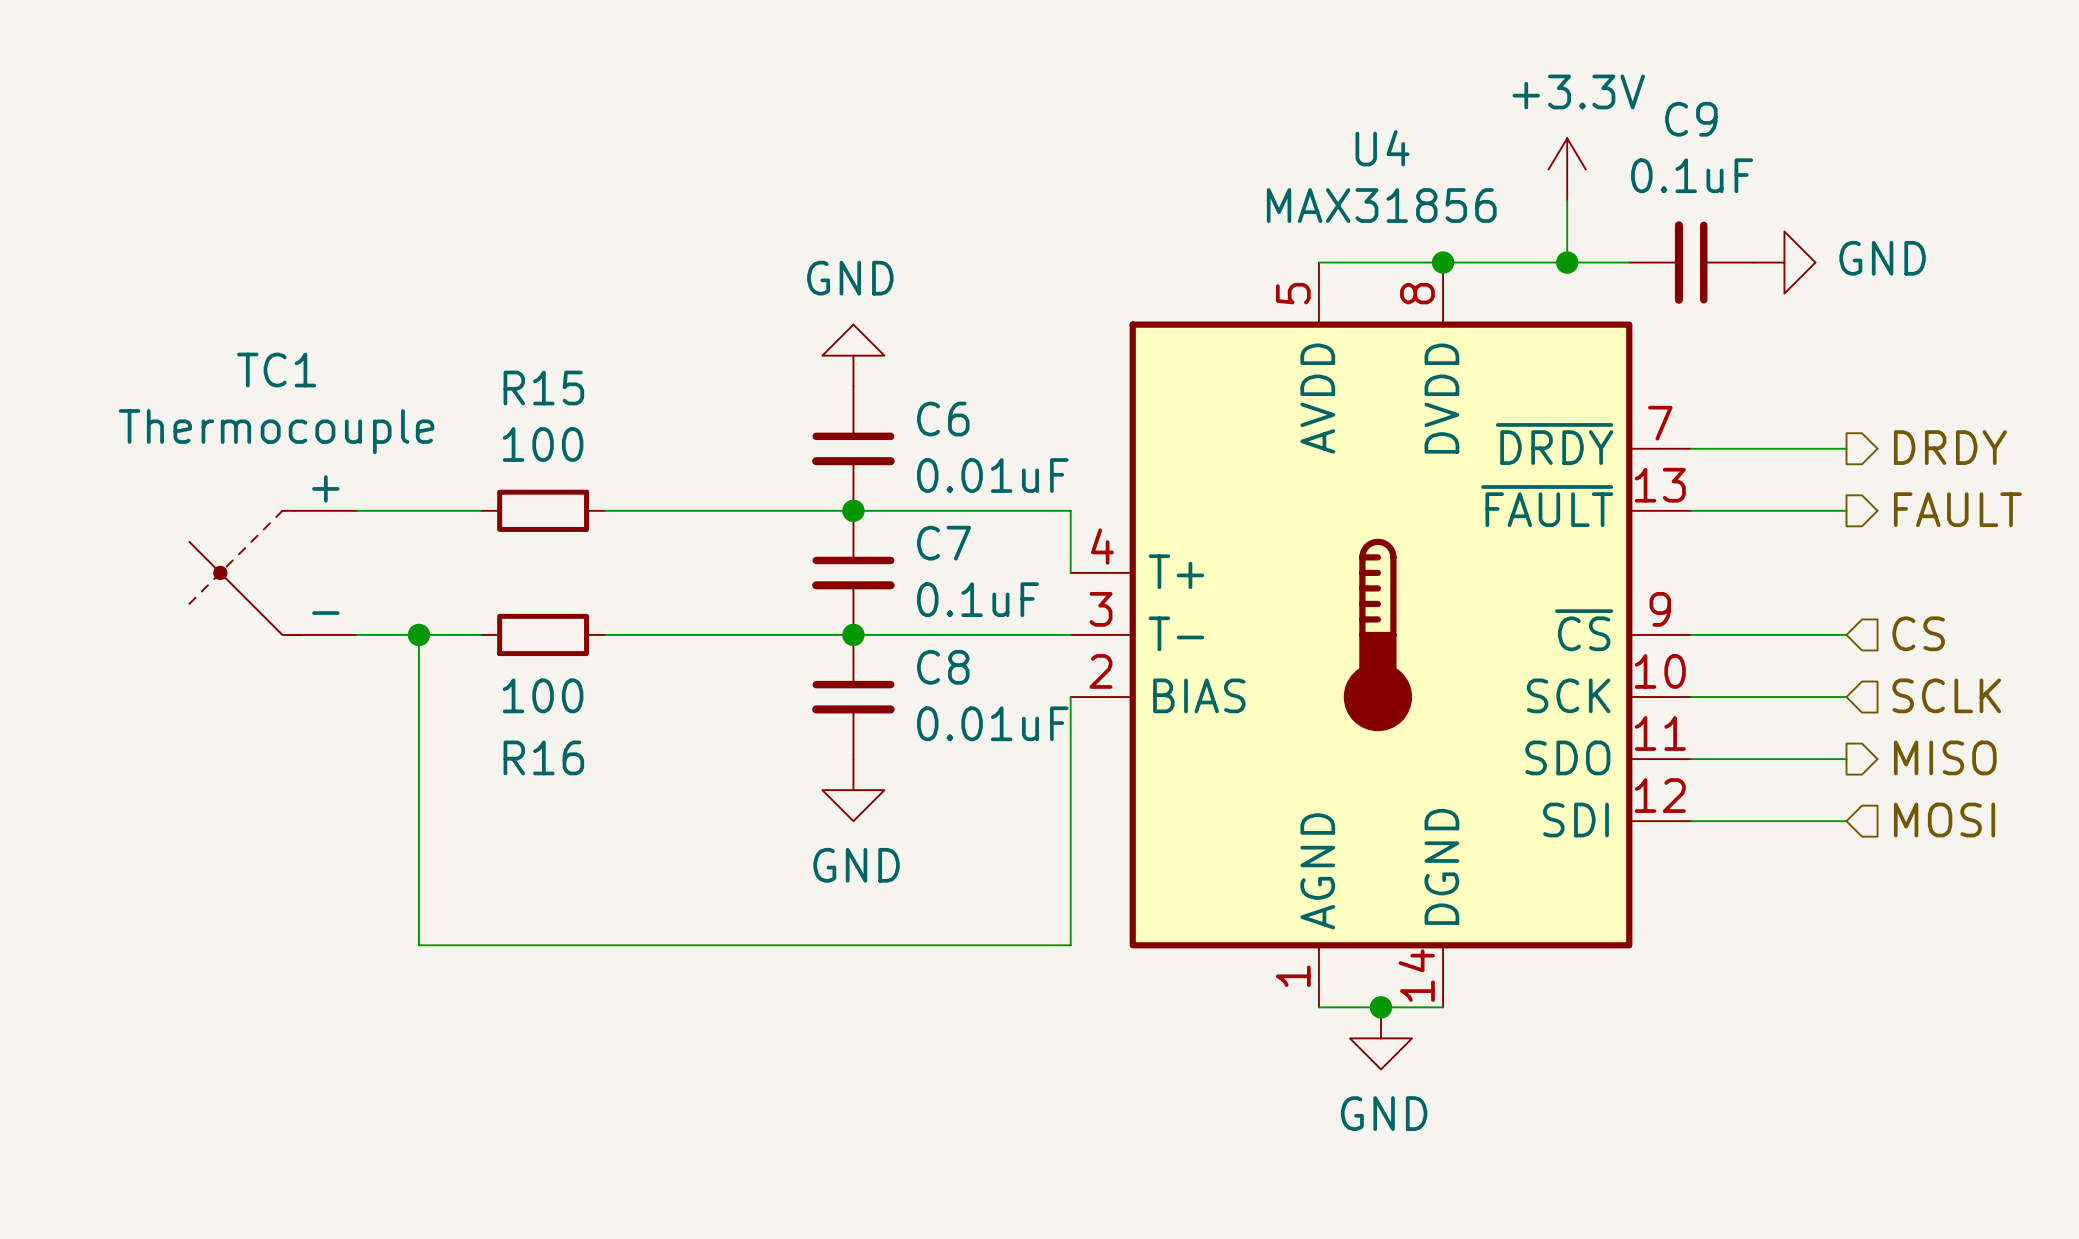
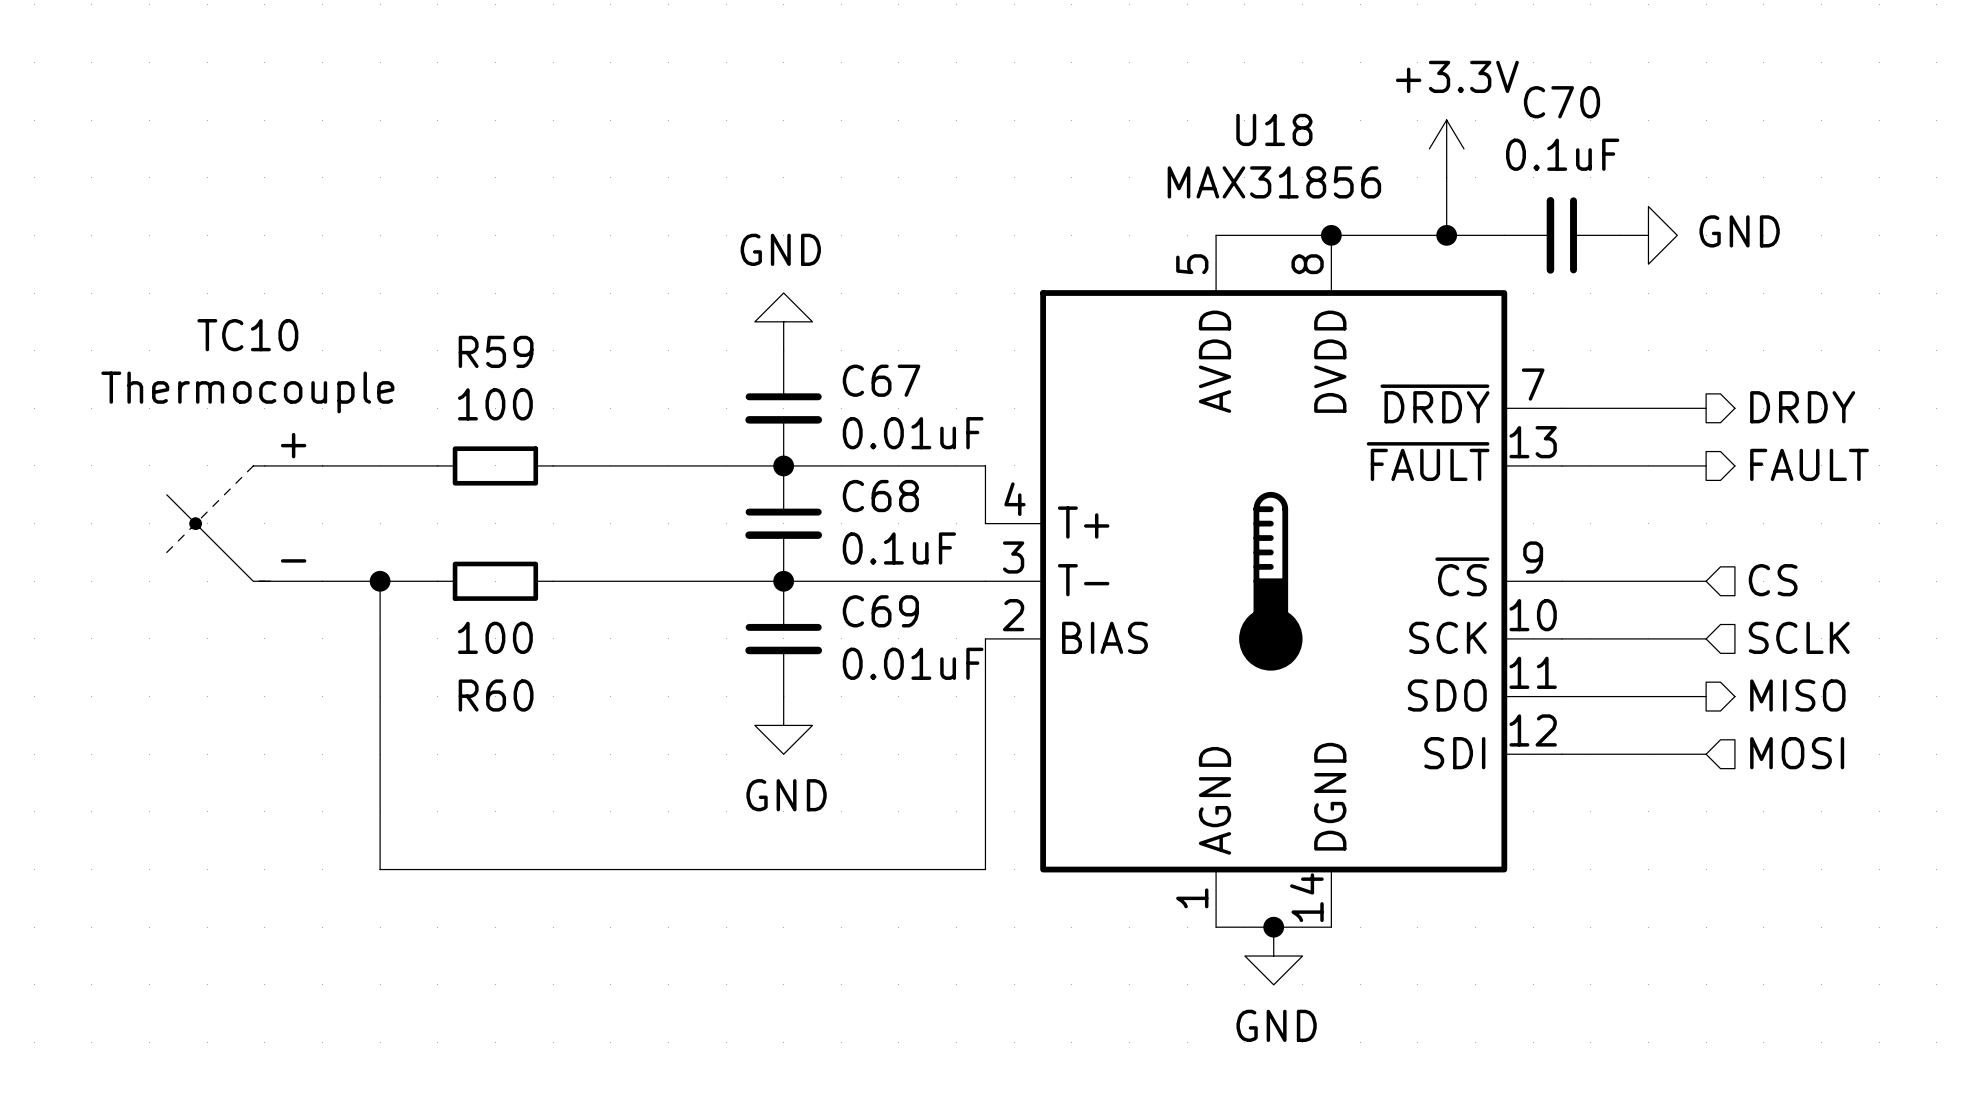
C9 name: C9 (1691, 119) -> C70 (1561, 102)
U4 name: U4 (1382, 148) -> U18 (1274, 129)
TC1 name: TC1 (276, 370) -> TC10 (247, 335)
R15 name: R15 (543, 388) -> R59 (496, 351)
C6 name: C6 (943, 419) -> C67 (881, 380)
C7 name: C7 (944, 543) -> C68 (880, 496)
C8 name: C8 (943, 667) -> C69 (880, 611)
R16 name: R16 (543, 757) -> R60 (496, 695)

